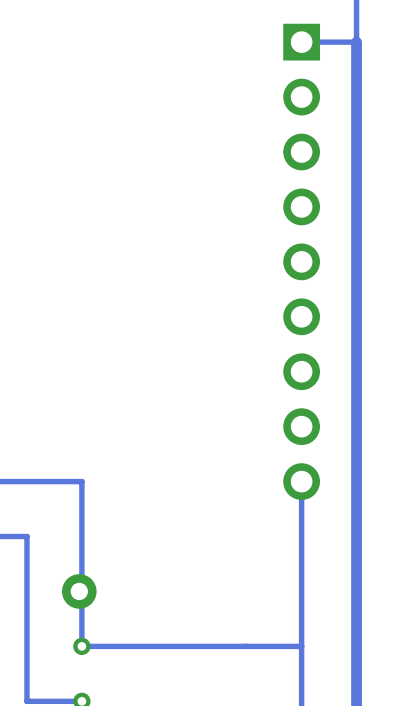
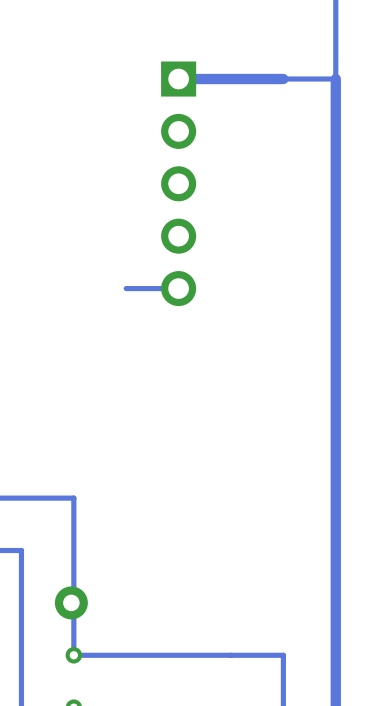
track: none -> (283, 79) (178, 79) (283, 79)
part: none -> (178, 183)
track: none -> (178, 288) (126, 288)
part: (301, 261) -> none
track: (301, 481) (301, 646) -> none

